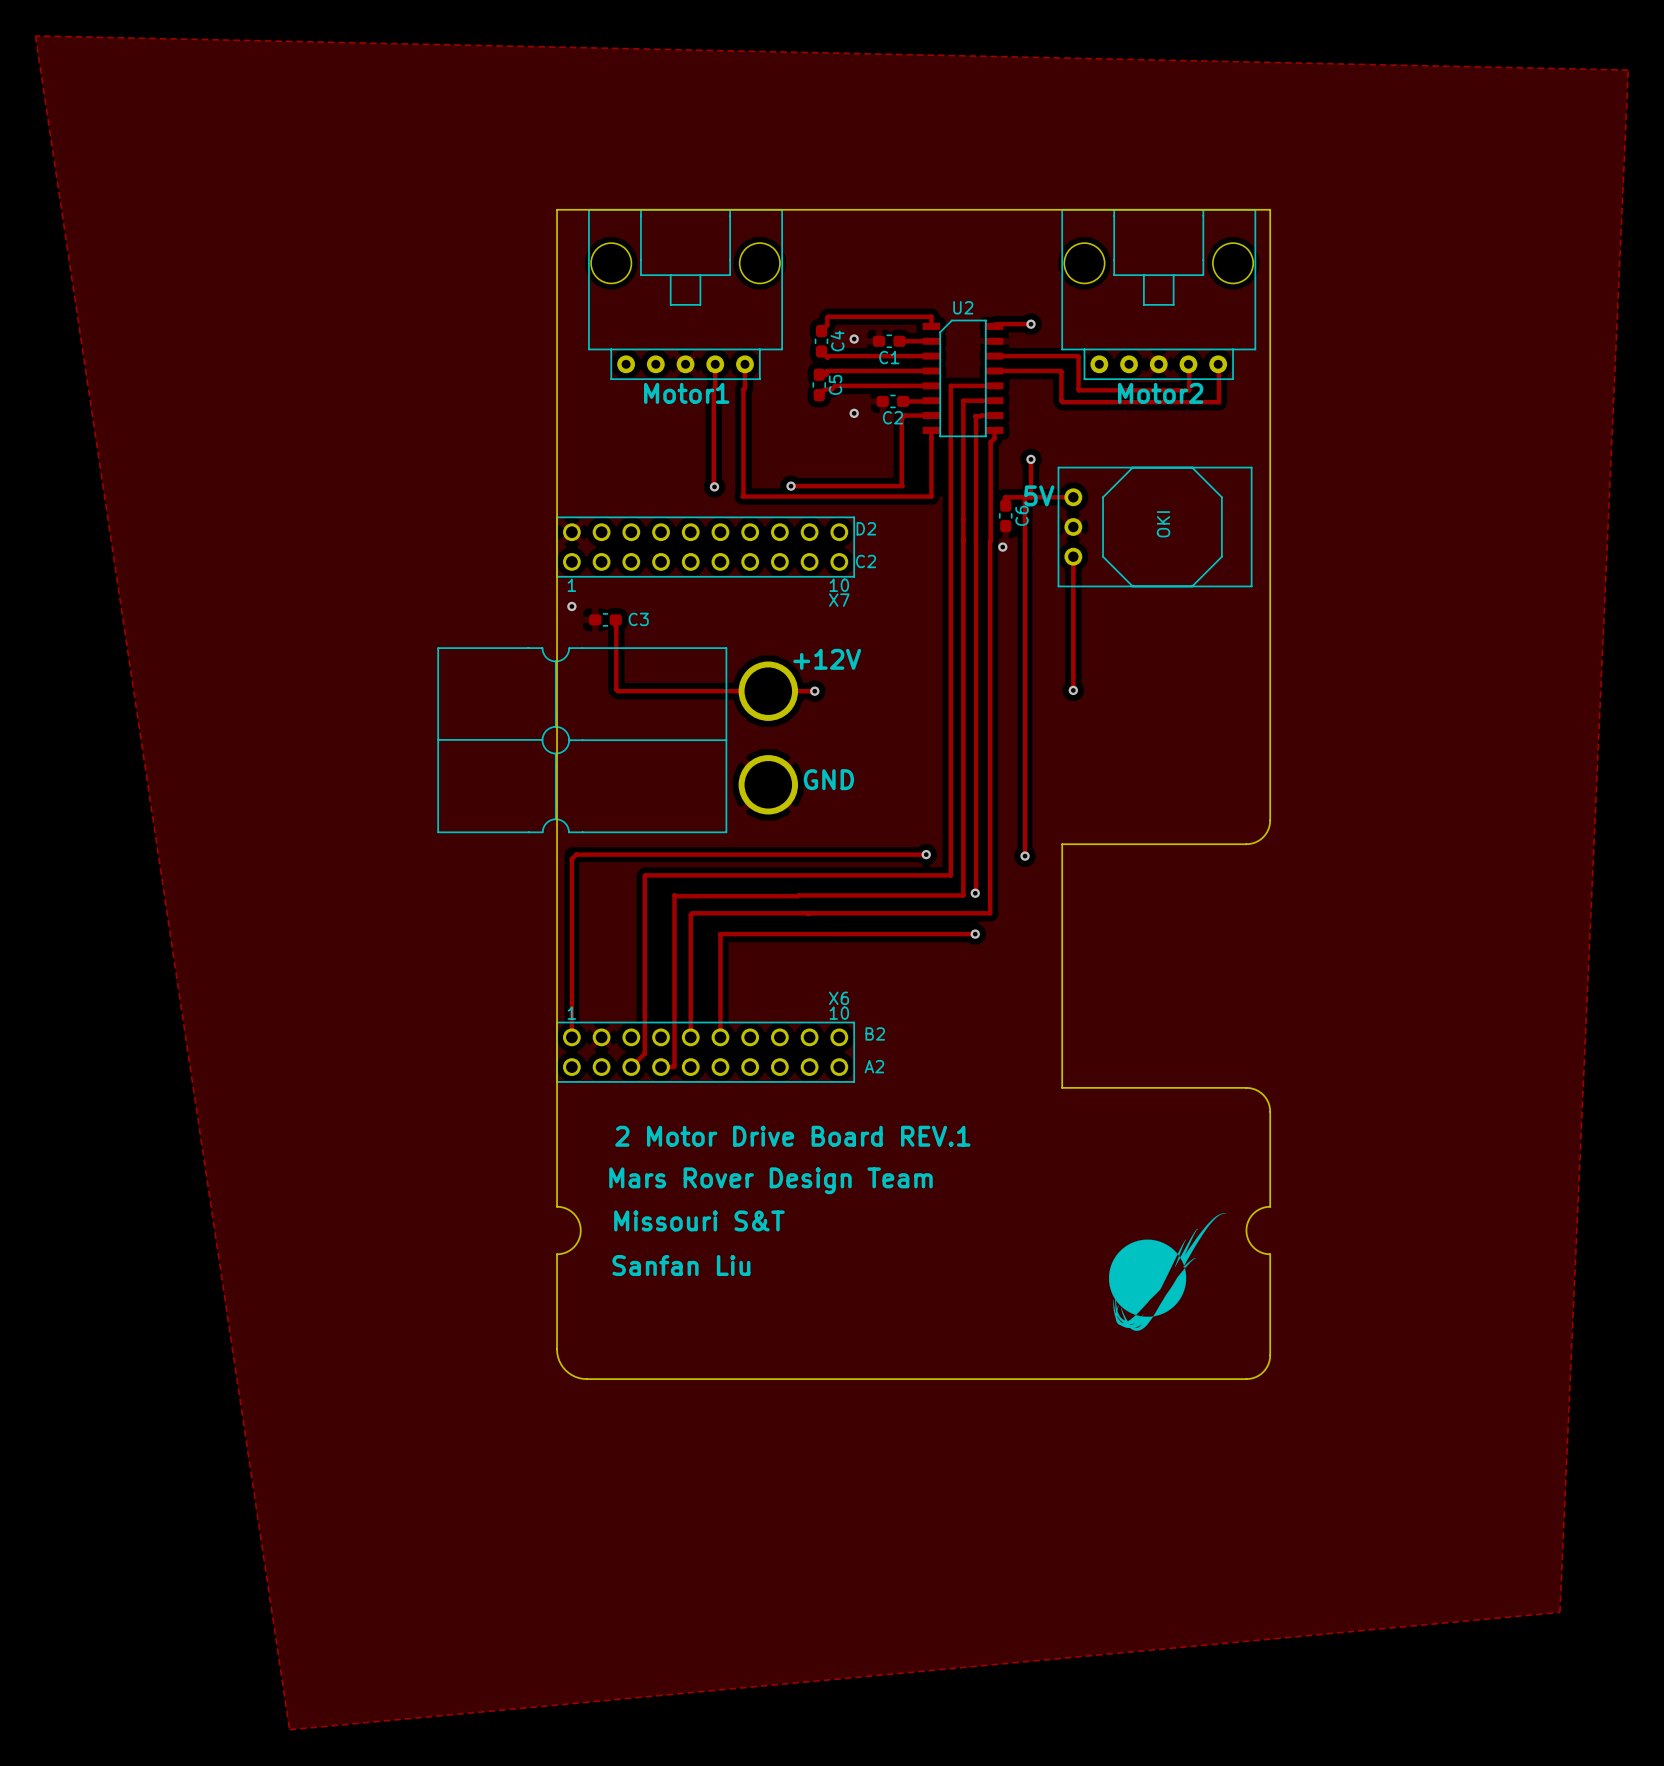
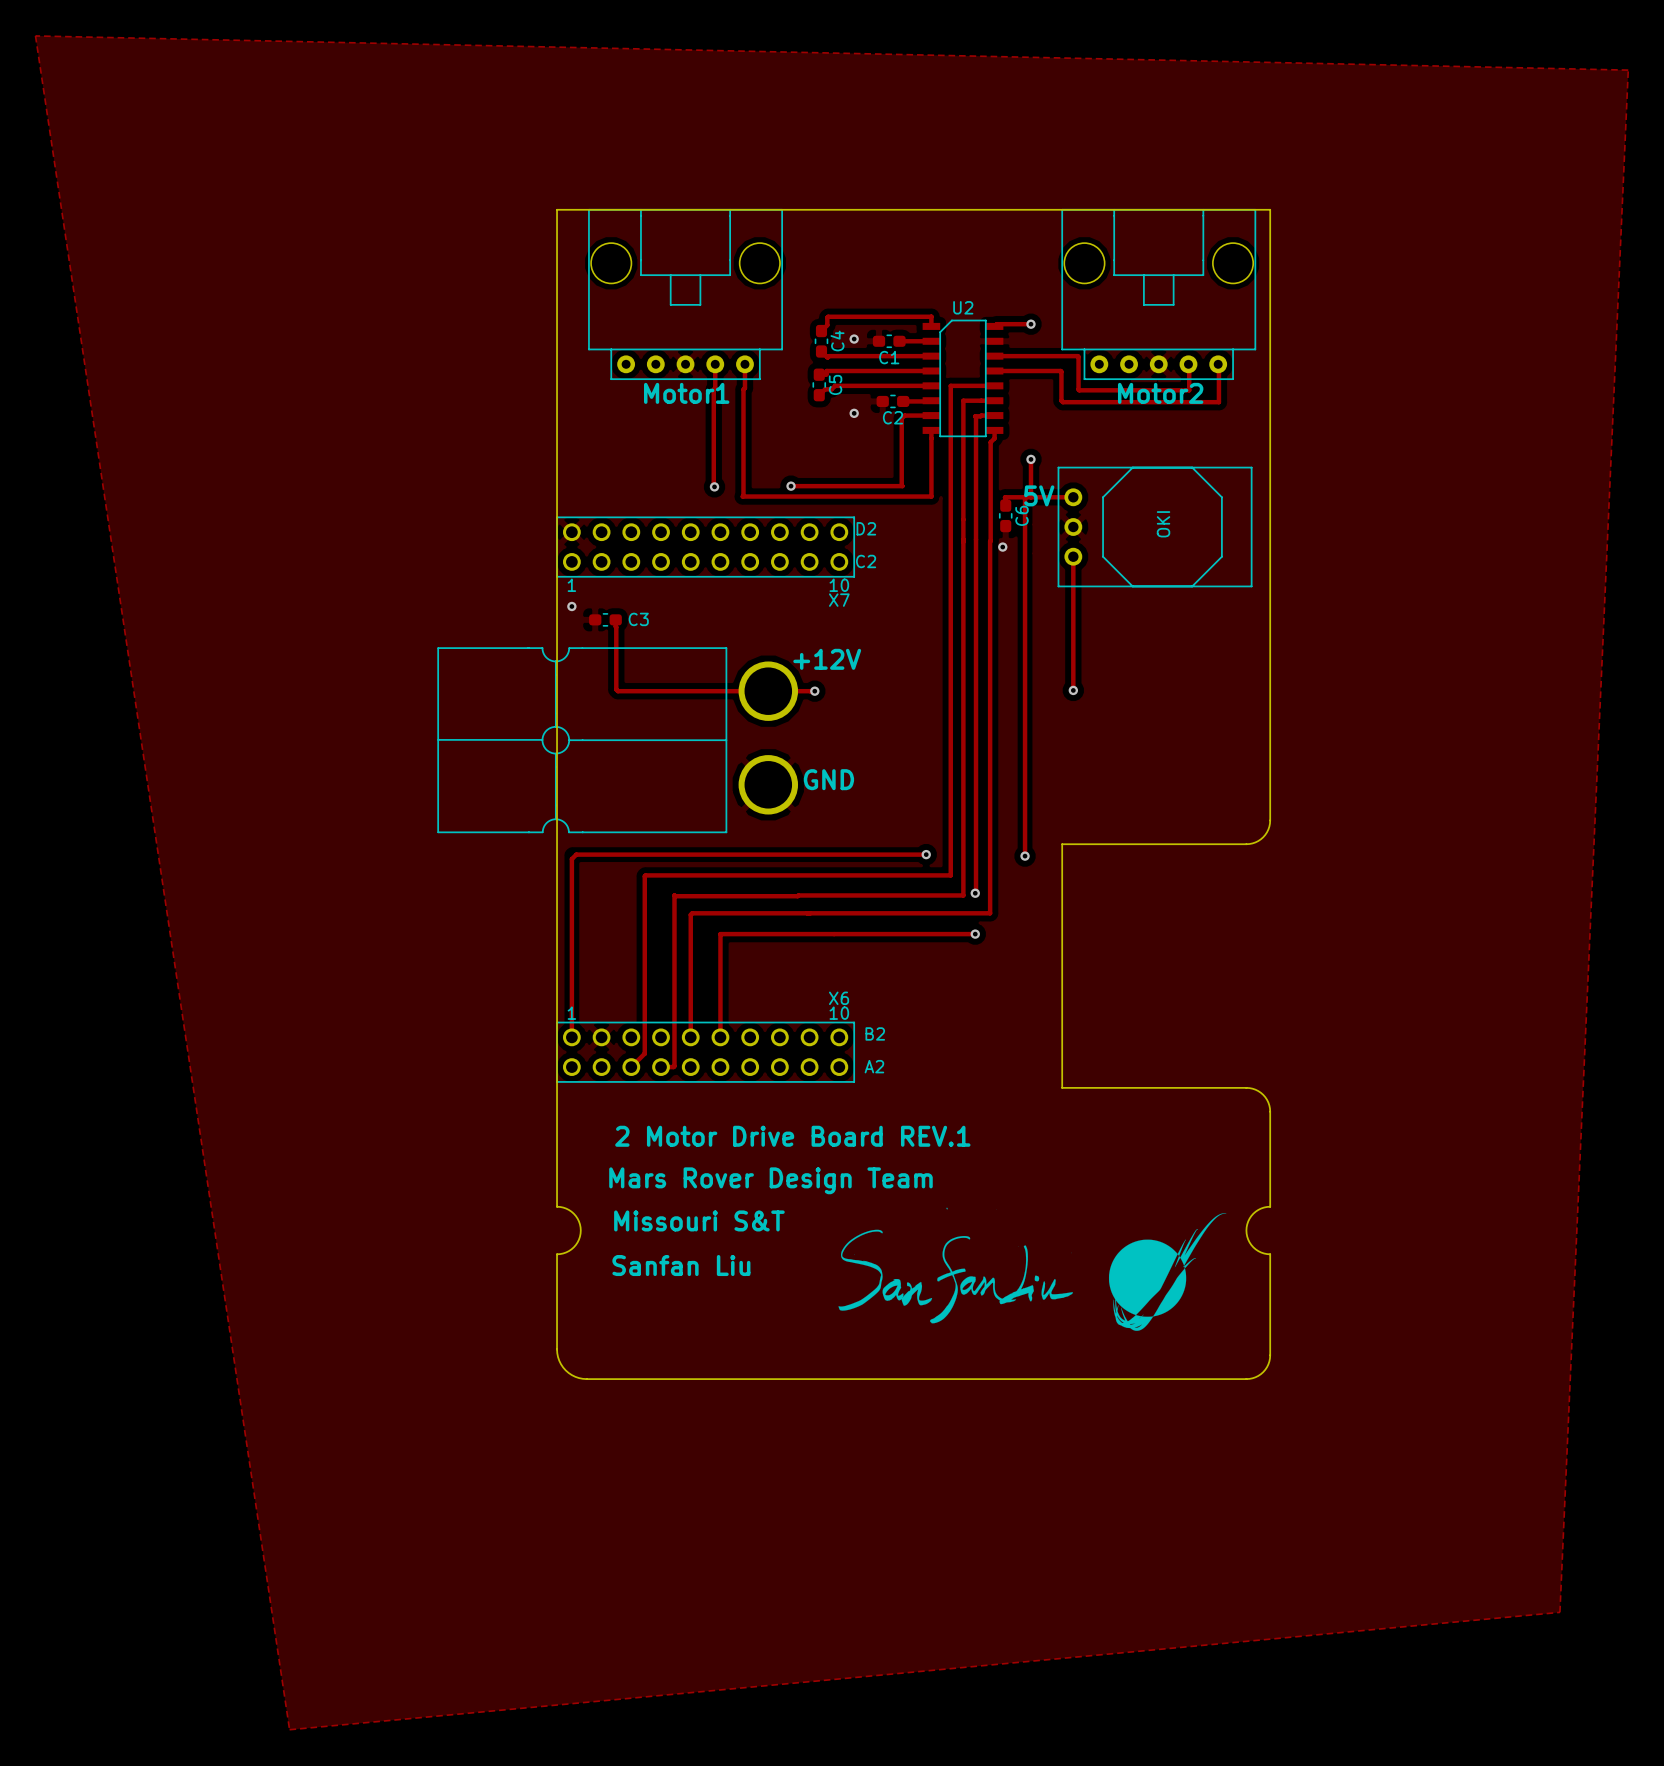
drawing: none -> [838, 1207, 1073, 1324]

